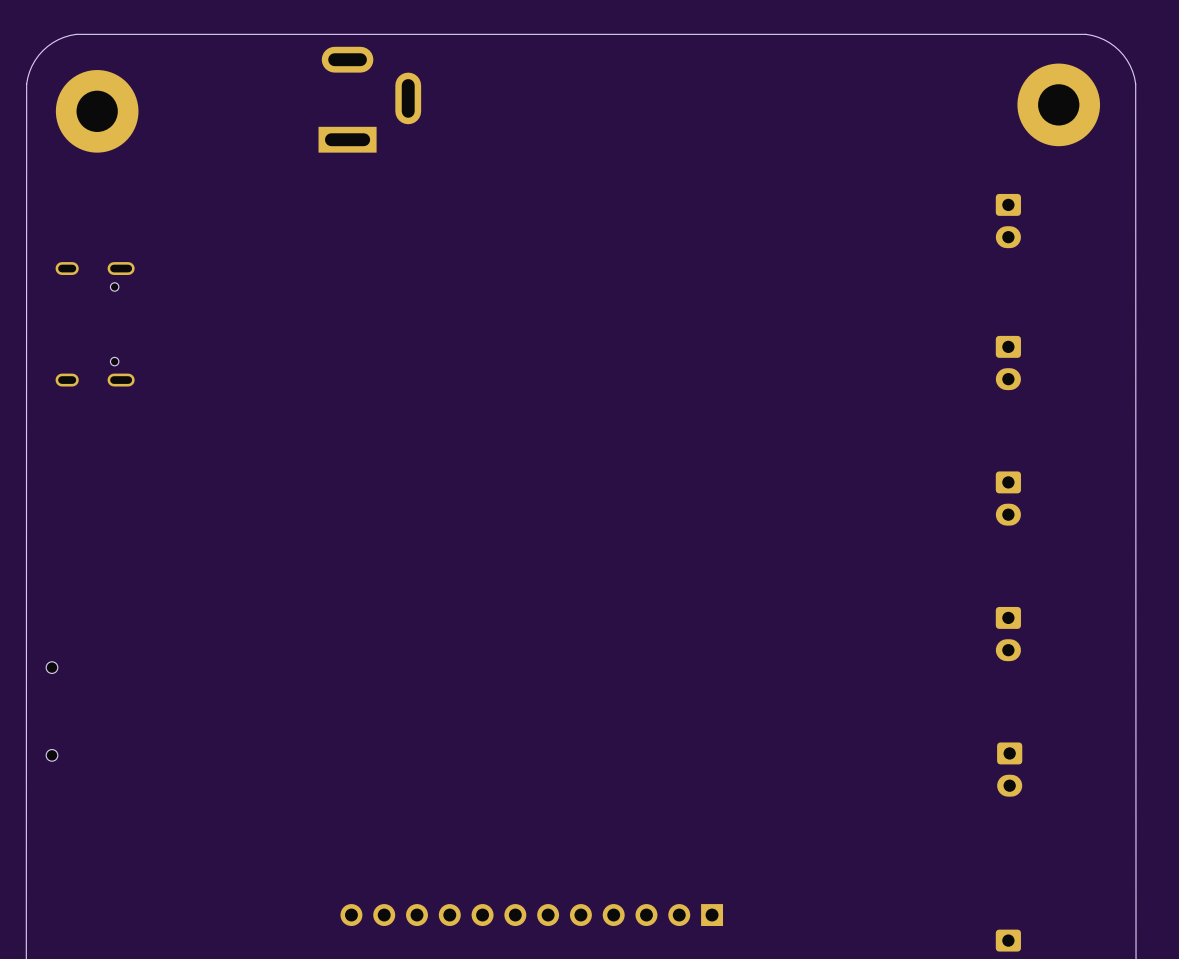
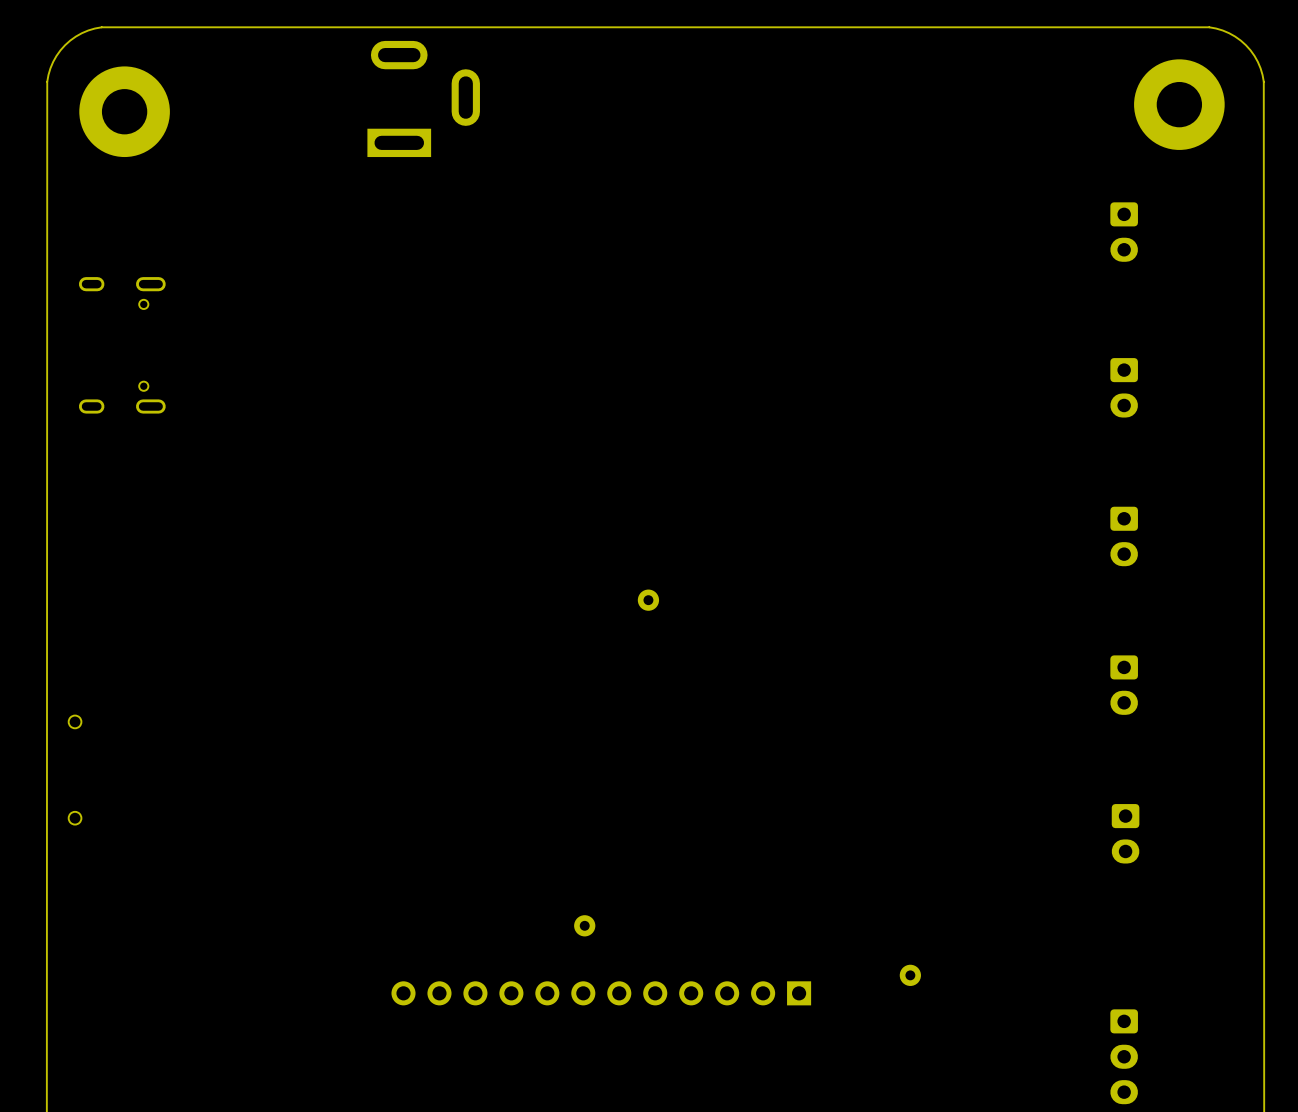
part: none -> (648, 600)
part: none -> (584, 925)
part: none -> (910, 975)

